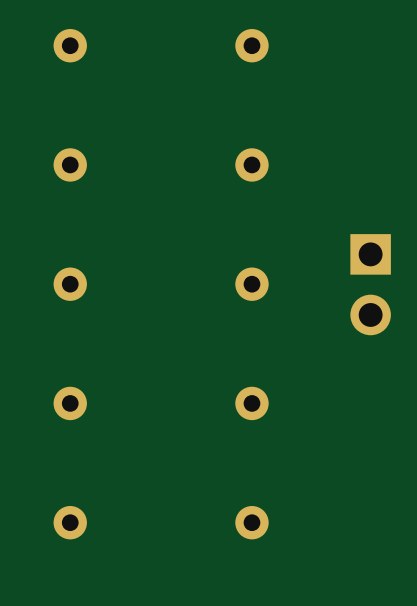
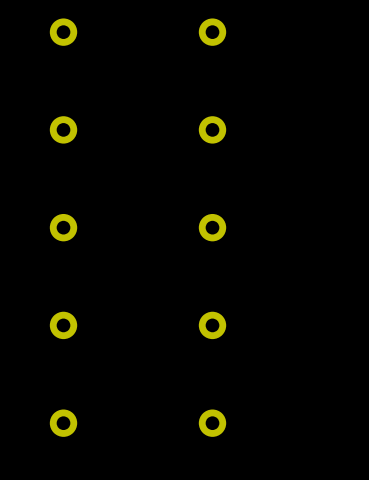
part: (370, 284) -> none

